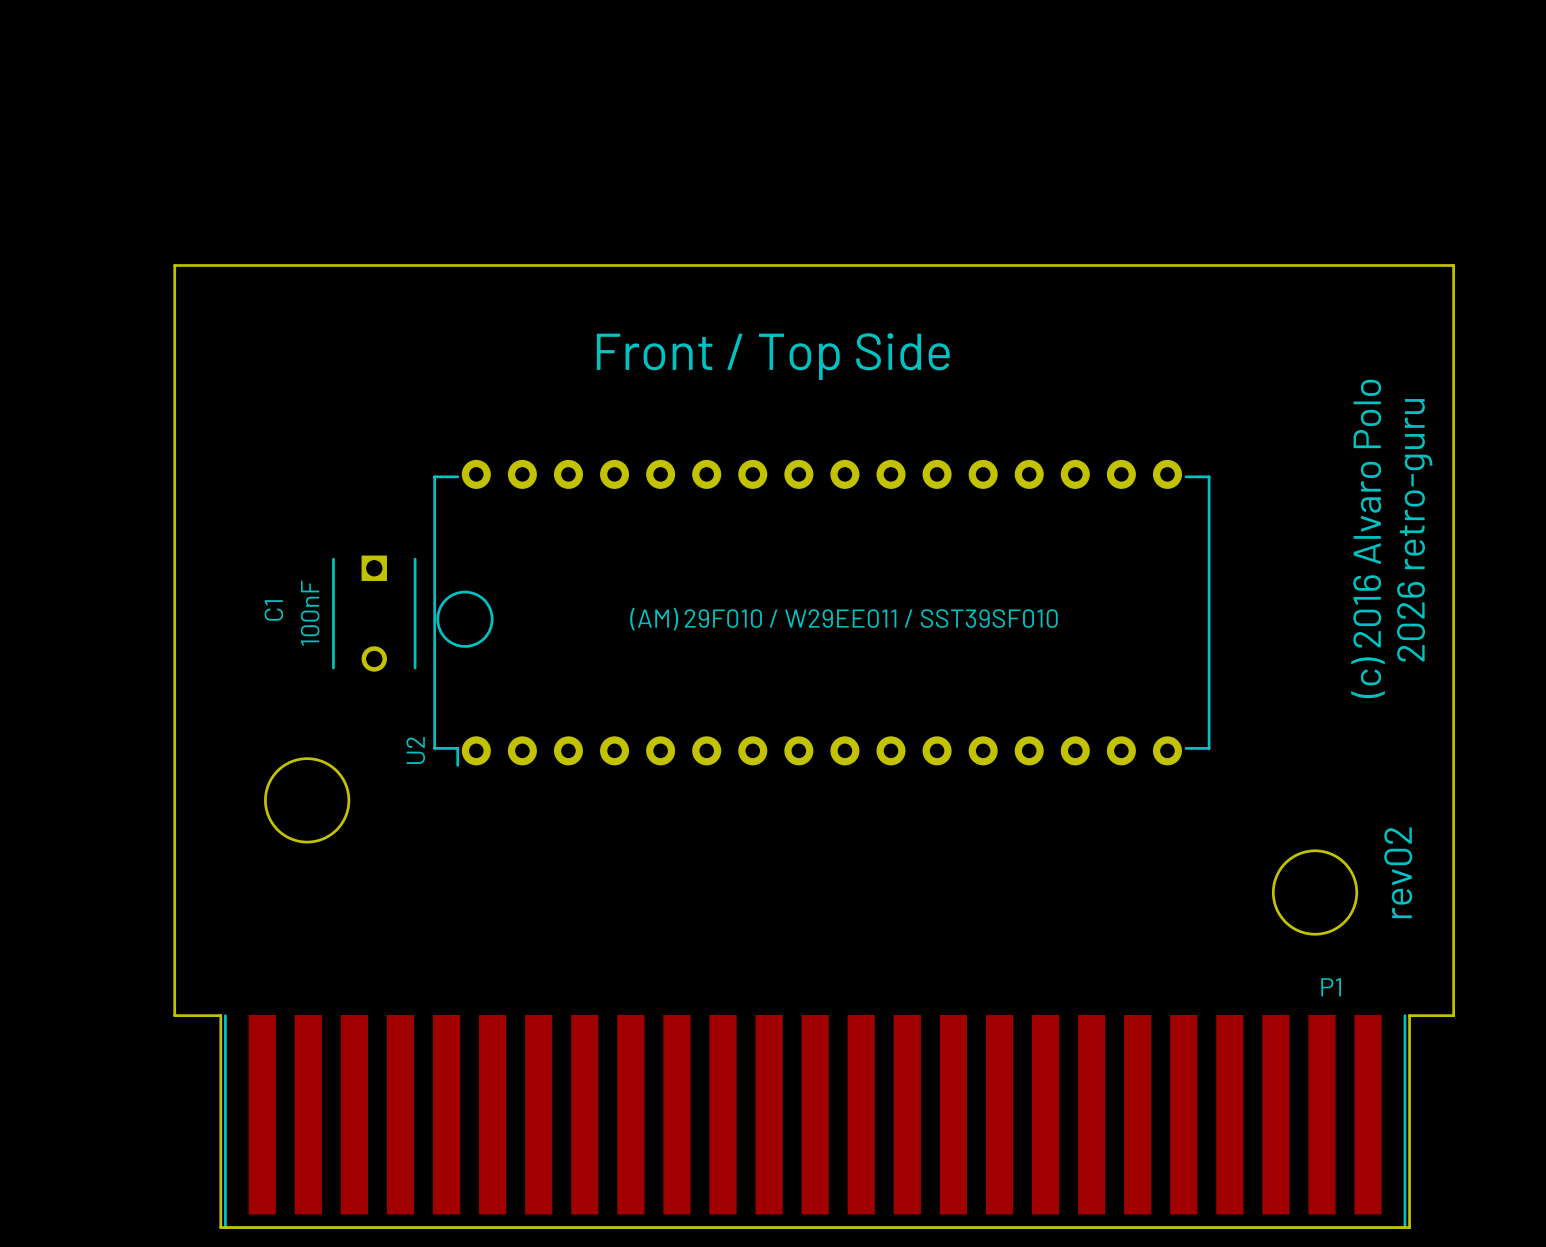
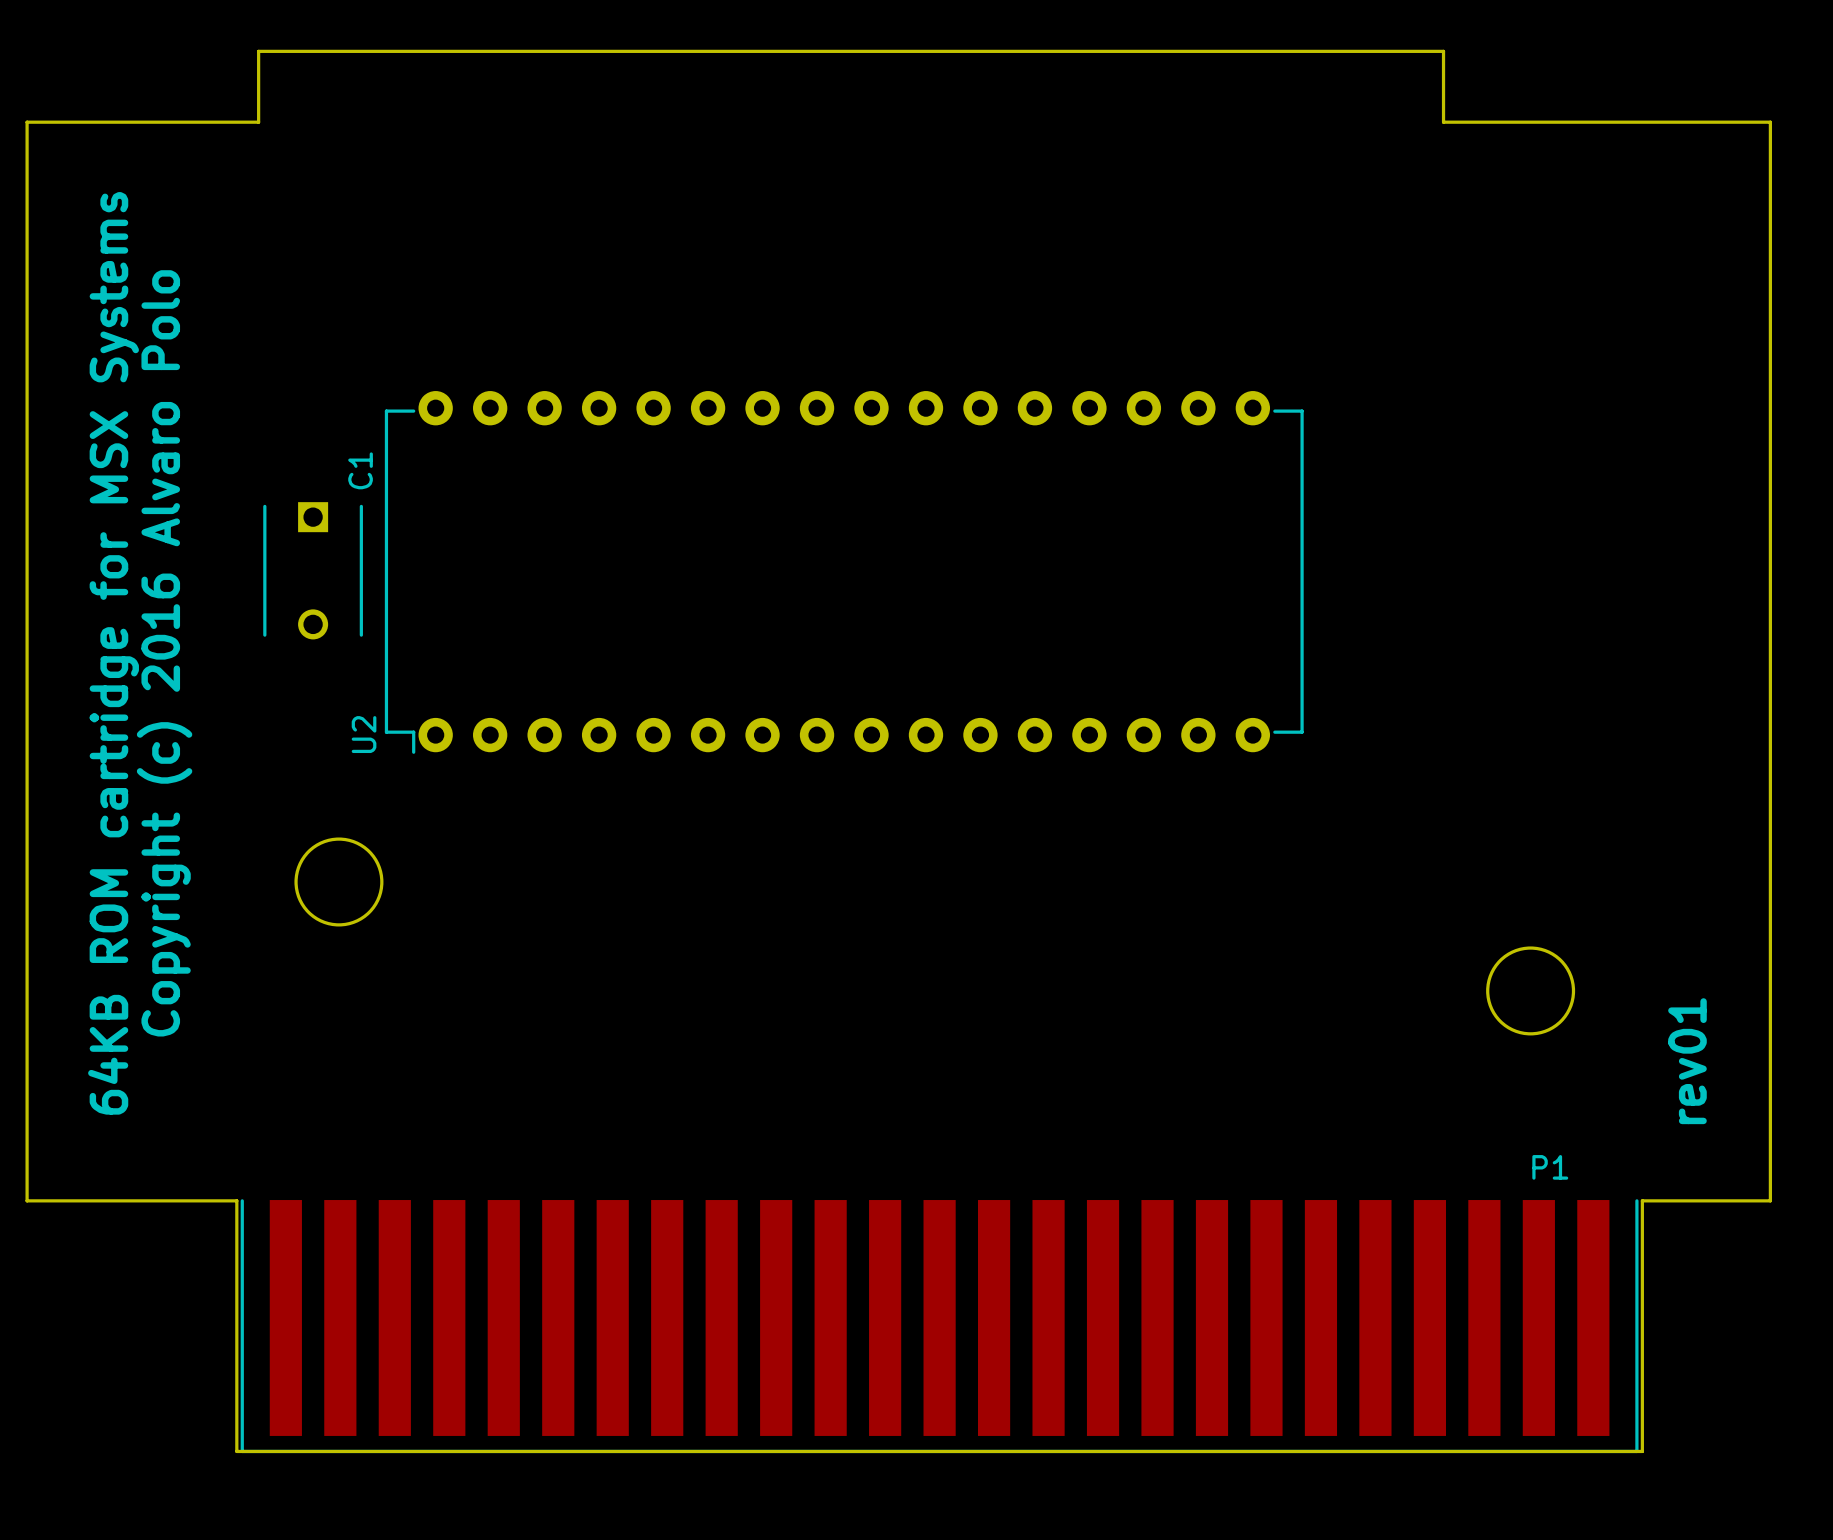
text: Front / Top Side (773, 356) -> none
text: 2026 retro-guru (1414, 530) -> none
text: (c) 2016 Alvaro Polo (1368, 538) -> none
text: none -> 64KB ROM cartridge for MSX Systems (113, 653)
text: none -> Copyright (c) 2016 Alvaro Polo (164, 653)
drawing: [436, 590, 494, 648] -> none
C1 name position: C1 (273, 610) -> C1 (360, 470)
C1 value: 100nF (310, 613) -> none
C1 position: (374, 613) -> (313, 570)
U2 position: (821, 613) -> (844, 572)
U2 value: (AM) 29F010 / W29EE011 / SST39SF010 (843, 619) -> none
round board edge: none -> [294, 837, 384, 927]
round board edge: [264, 757, 351, 844] -> none
round board edge: none -> [1486, 946, 1576, 1036]
round board edge: [1271, 849, 1359, 936] -> none
text: rev02 (1398, 872) -> rev01 (1687, 1061)
board edge: (174, 1015) (174, 265) (1453, 265) (1453, 1015) -> (182, 1200) (27, 1200) (27, 122) (258, 122) (258, 51) (1443, 51) (1443, 122) (1770, 122) (1770, 1200) (1694, 1200)

